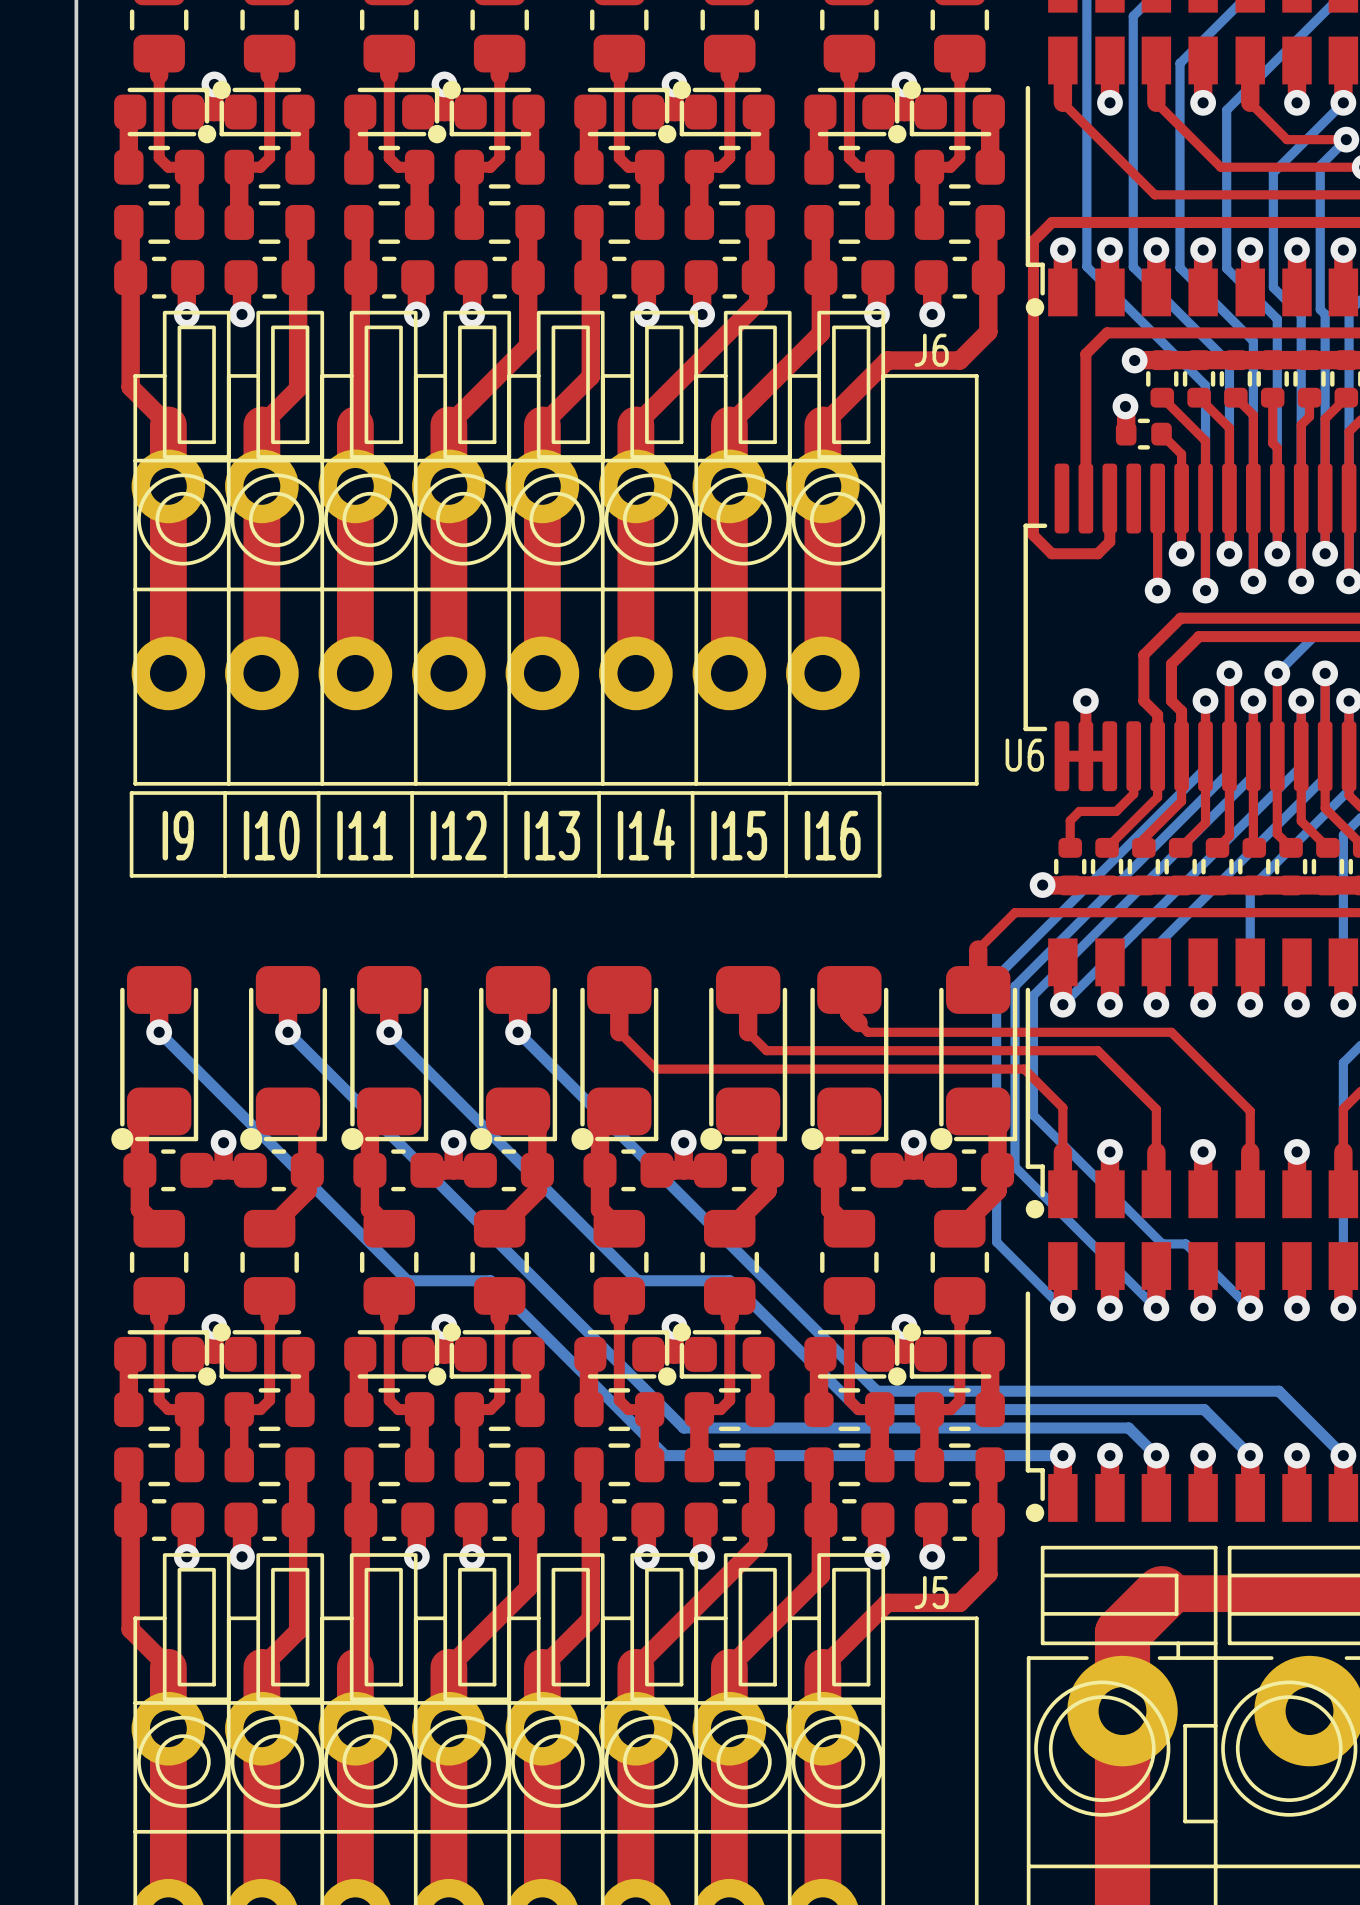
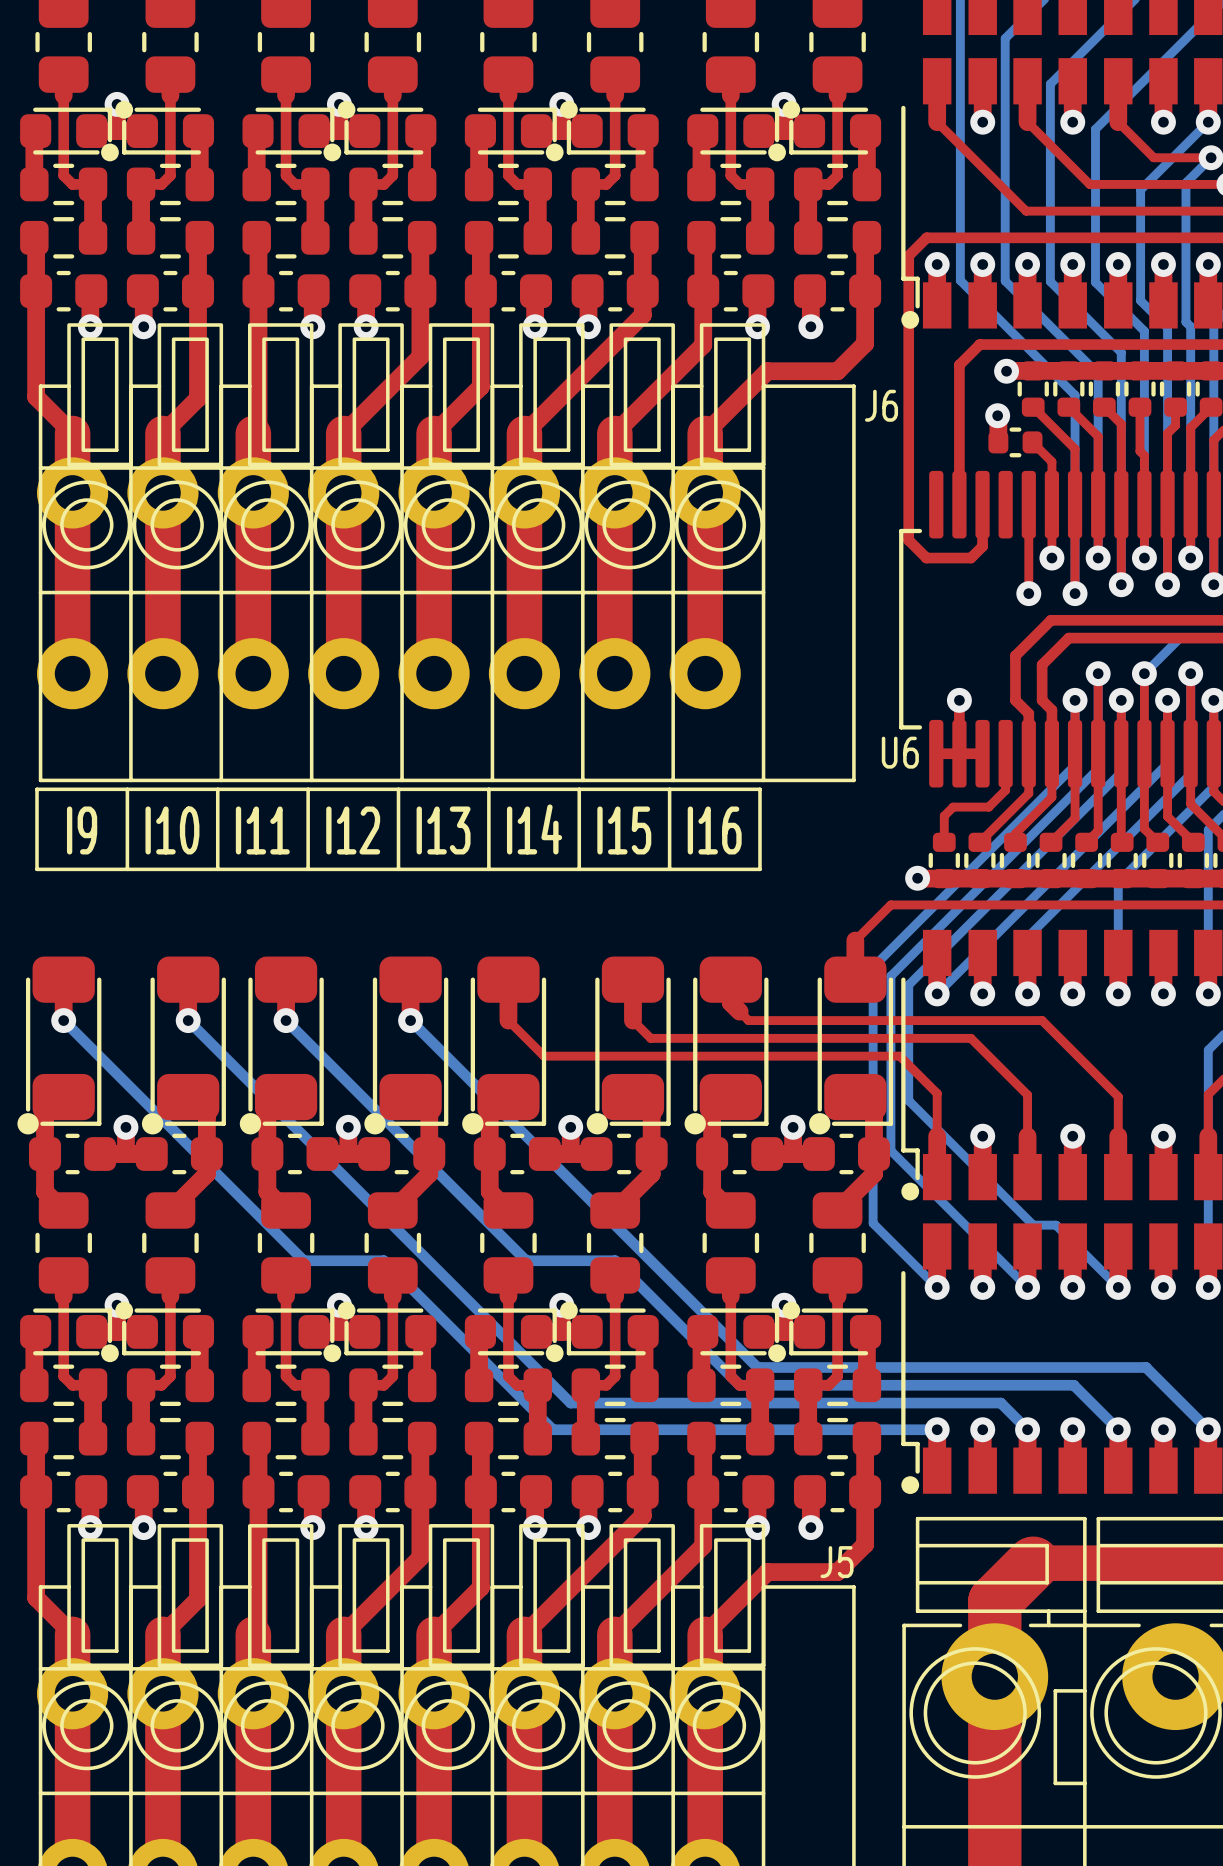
J6 name position: J6 (931, 350) -> J6 (881, 405)
J5 name position: J5 (931, 1592) -> J5 (837, 1562)

